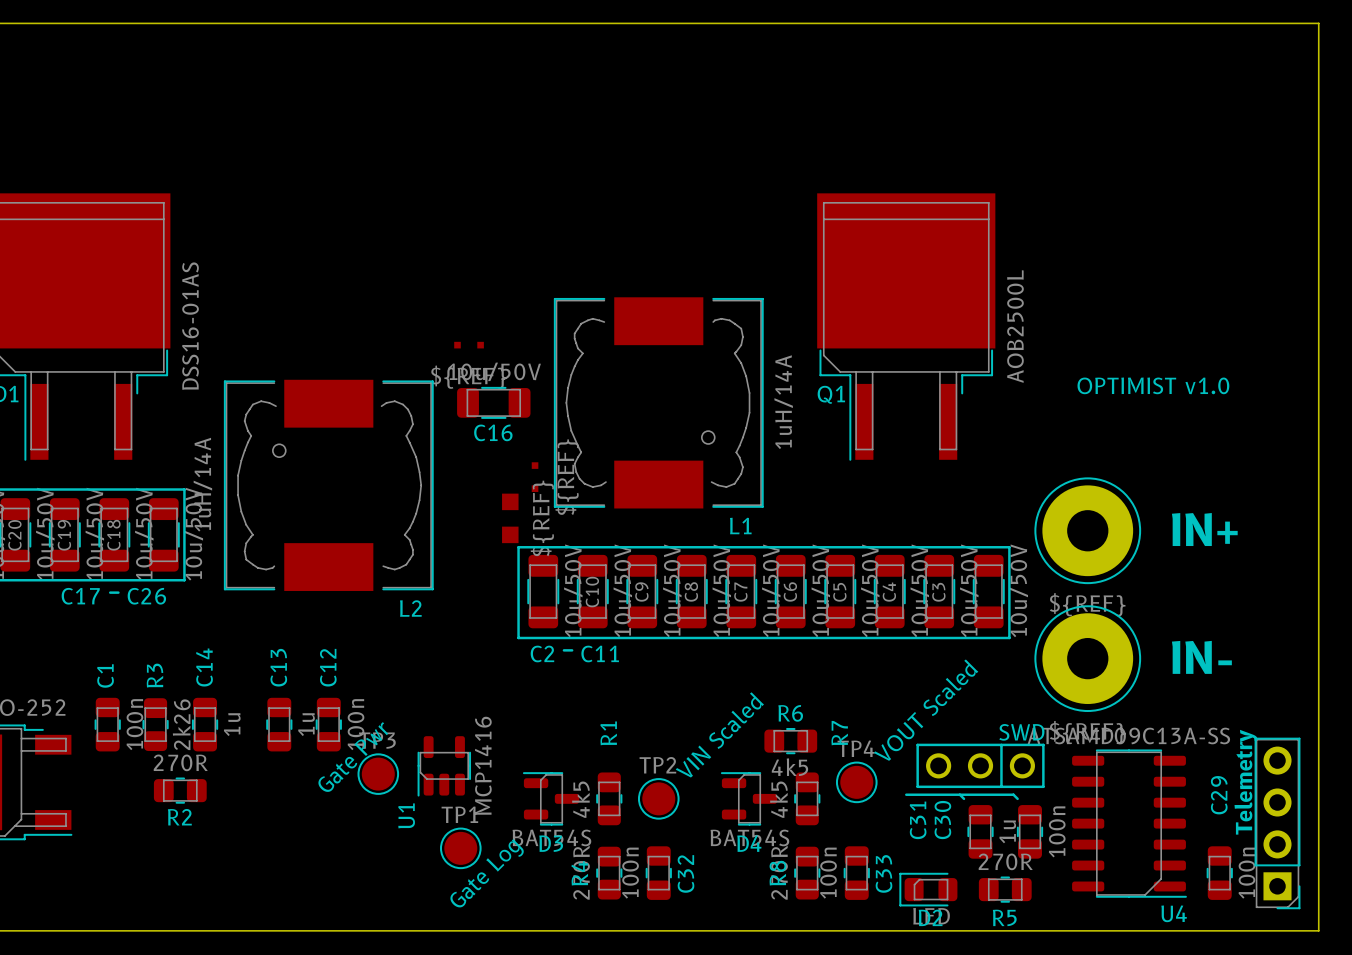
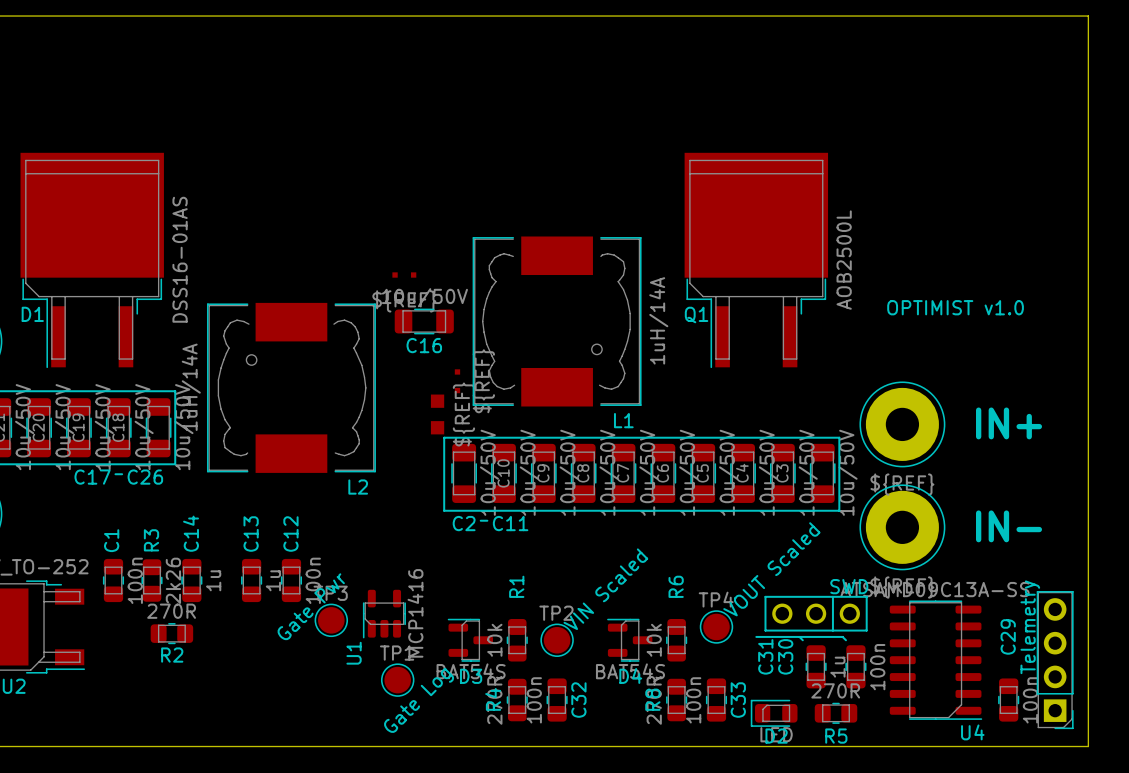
R7 name: R7 (839, 733) -> R6 (676, 586)
R6: 4k5 (790, 741) -> none
R1 value: 4k5 (580, 799) -> 10k (494, 640)
R7 value: 4k5 (778, 799) -> 10k (654, 640)

